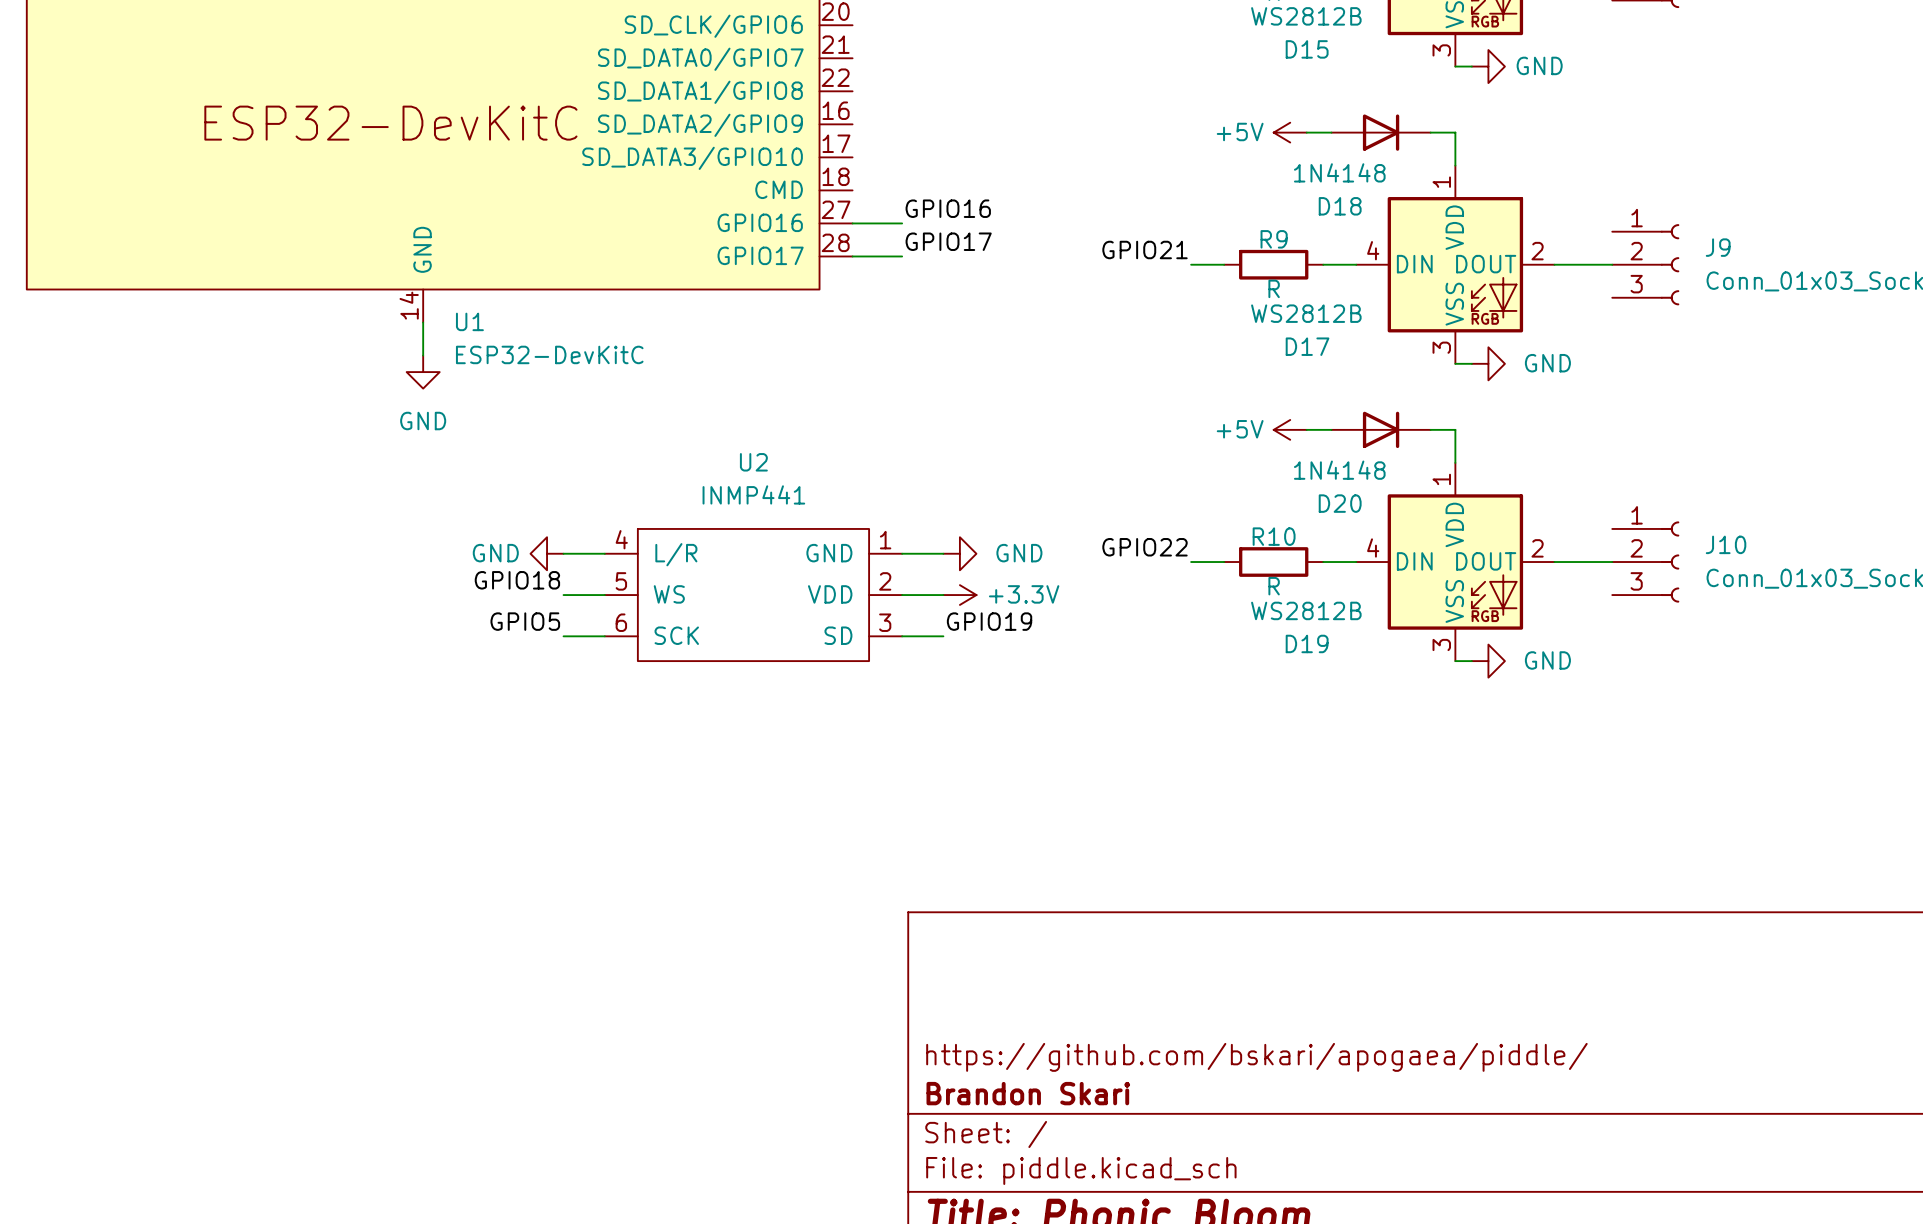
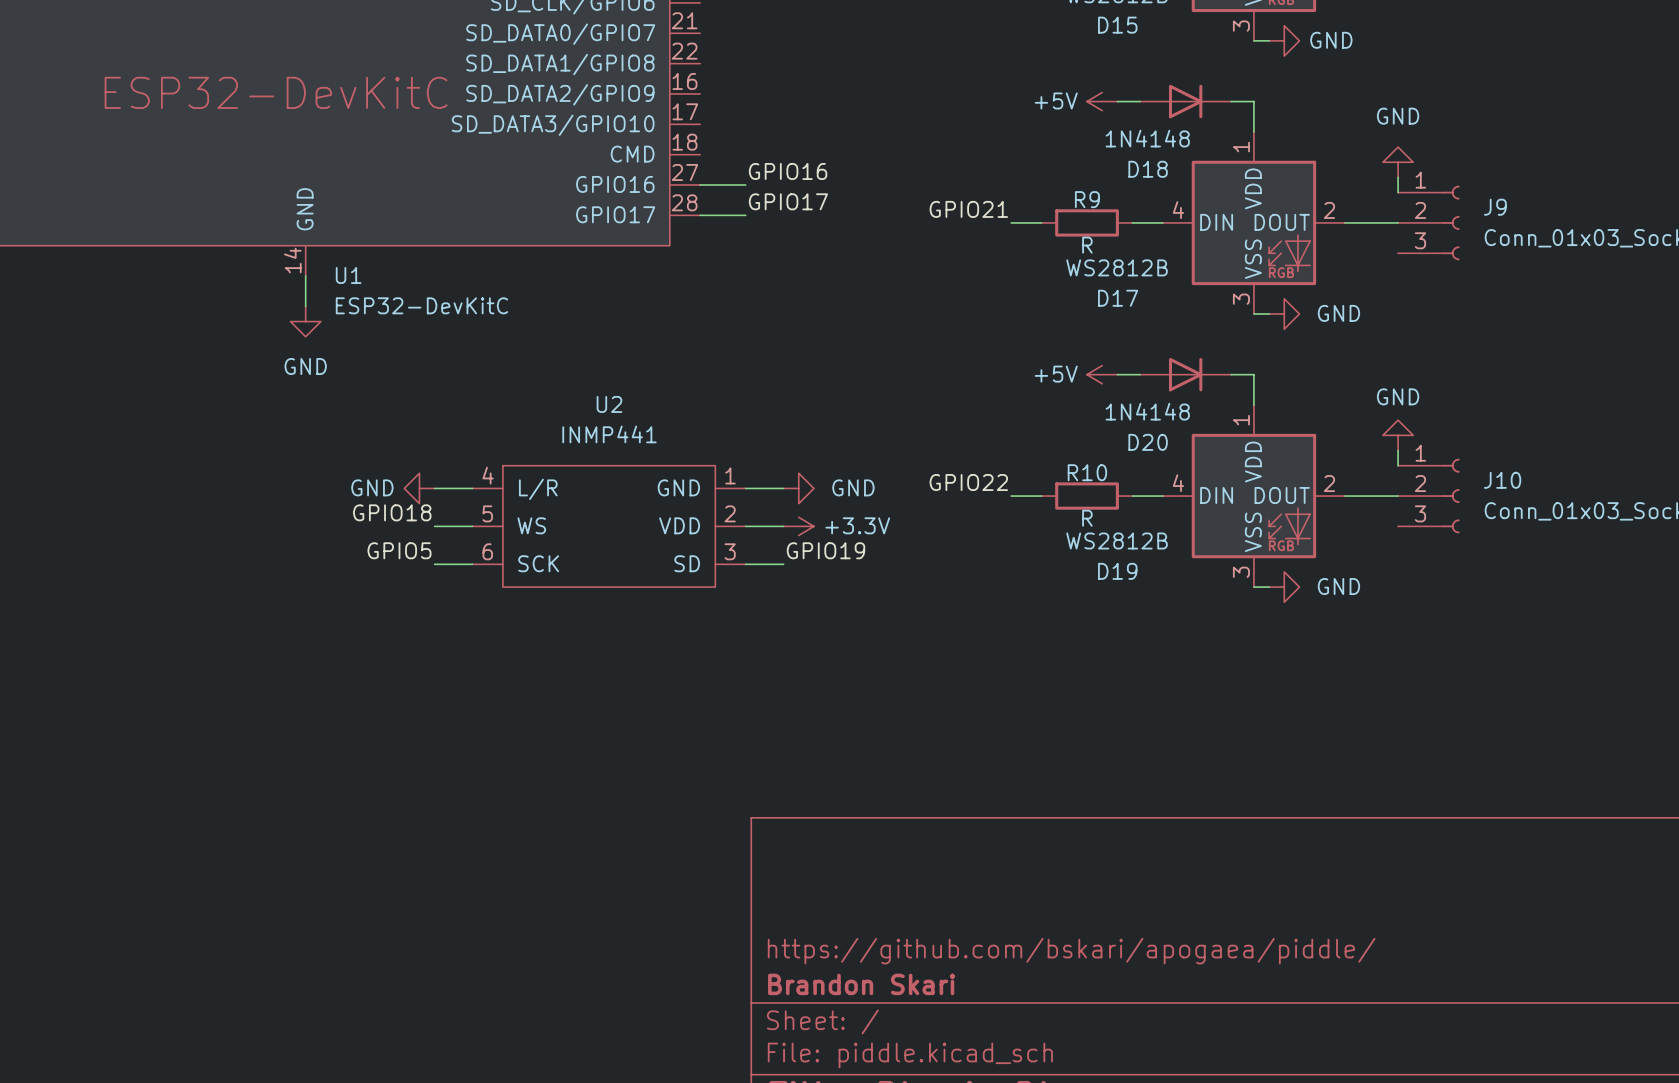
power symbol: none -> GND (1398, 162)
wire: none -> (1398, 177) (1398, 192)
power symbol: none -> GND (1398, 435)
wire: none -> (1398, 450) (1398, 465)

